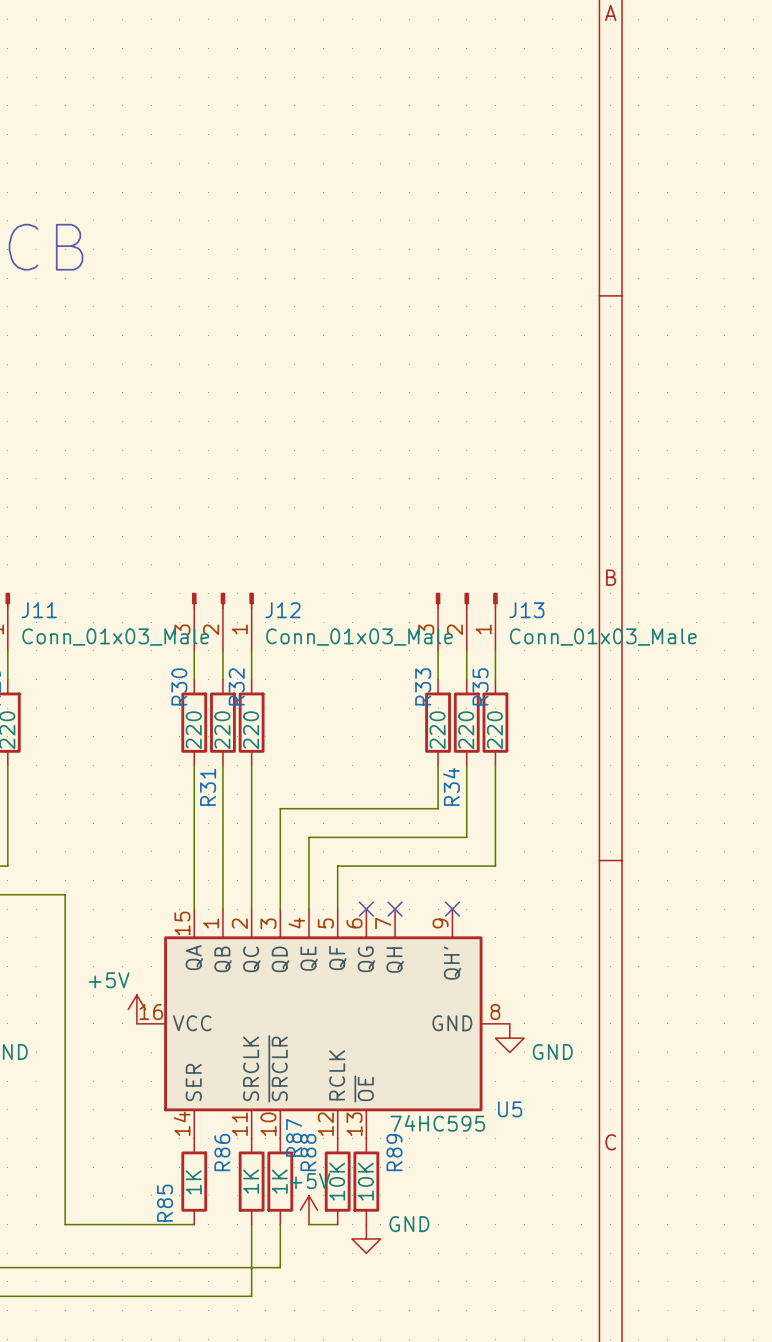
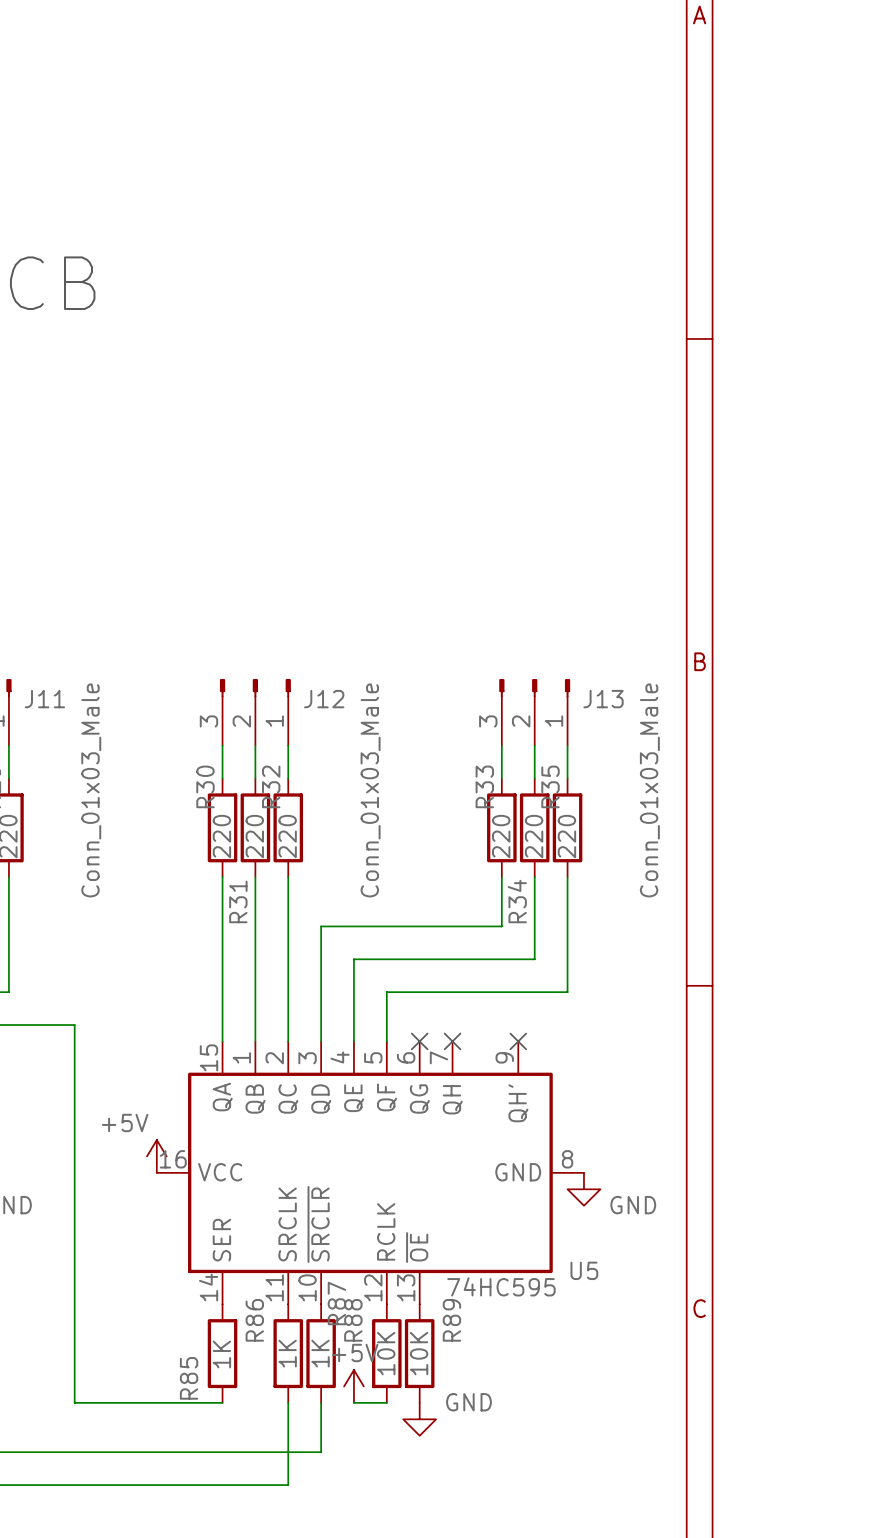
J11 value rotation: 0° (115, 637) -> 90° counterclockwise (91, 790)
J12 value rotation: 0° (359, 637) -> 90° counterclockwise (370, 790)
J13 value rotation: 0° (603, 637) -> 90° counterclockwise (649, 790)

